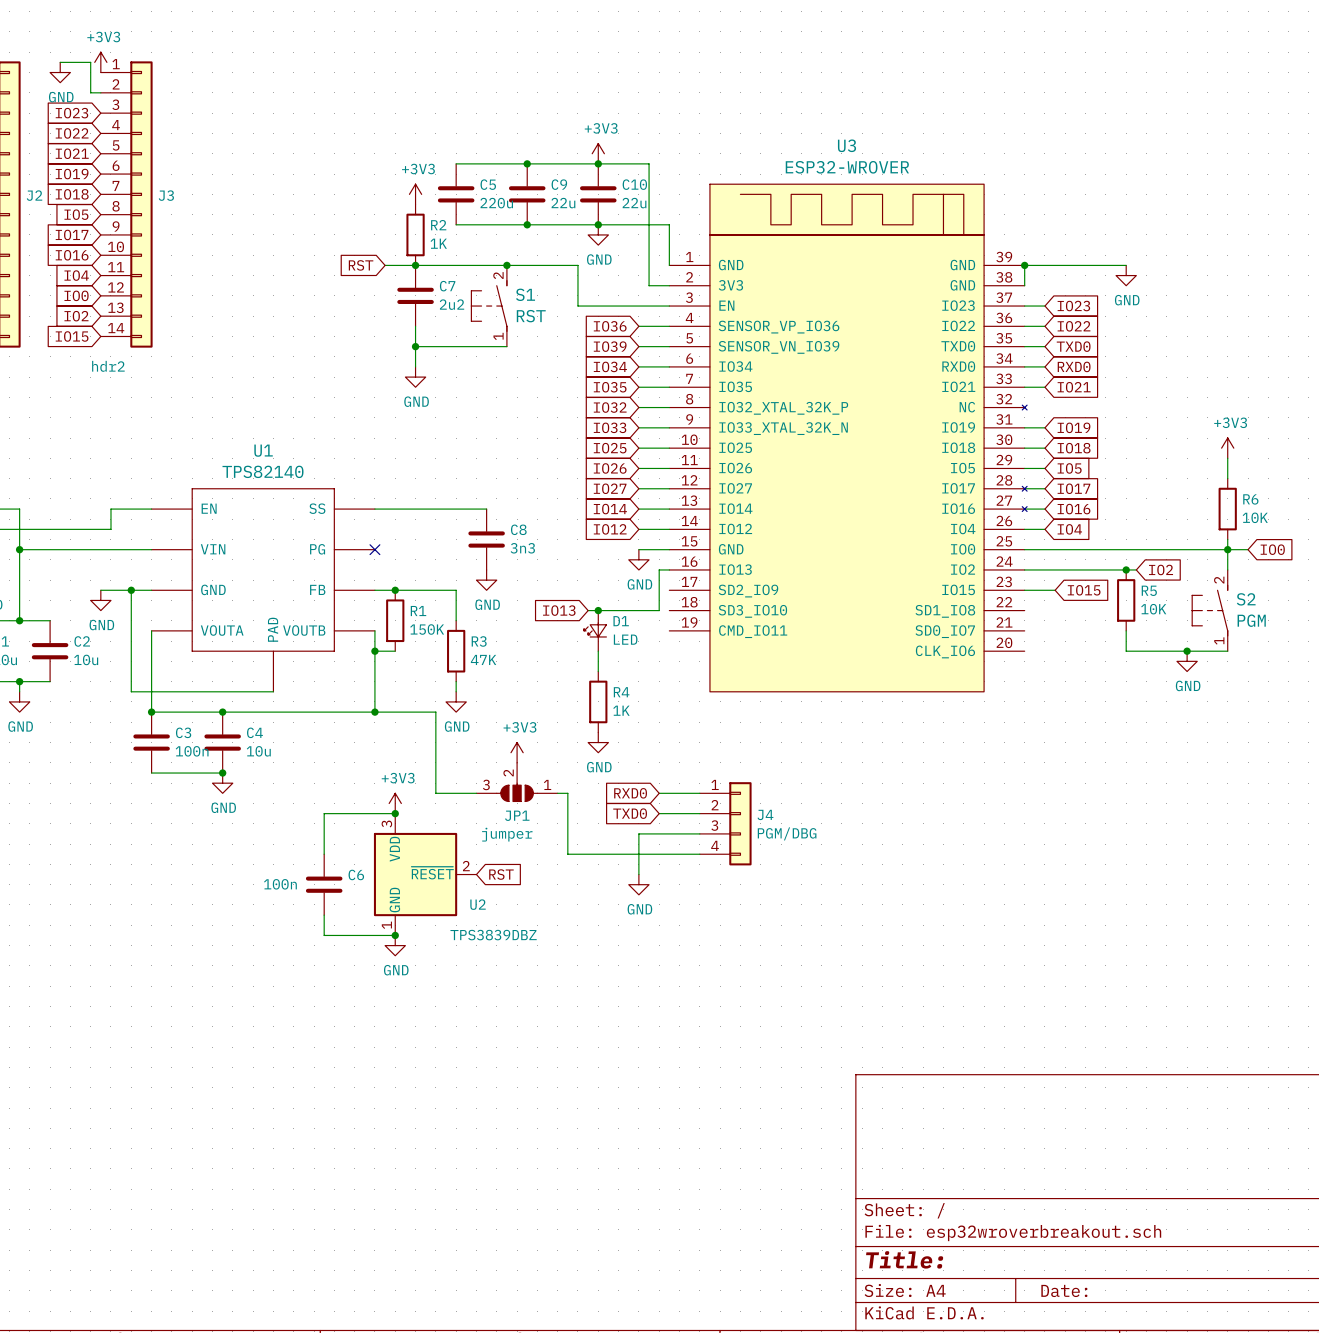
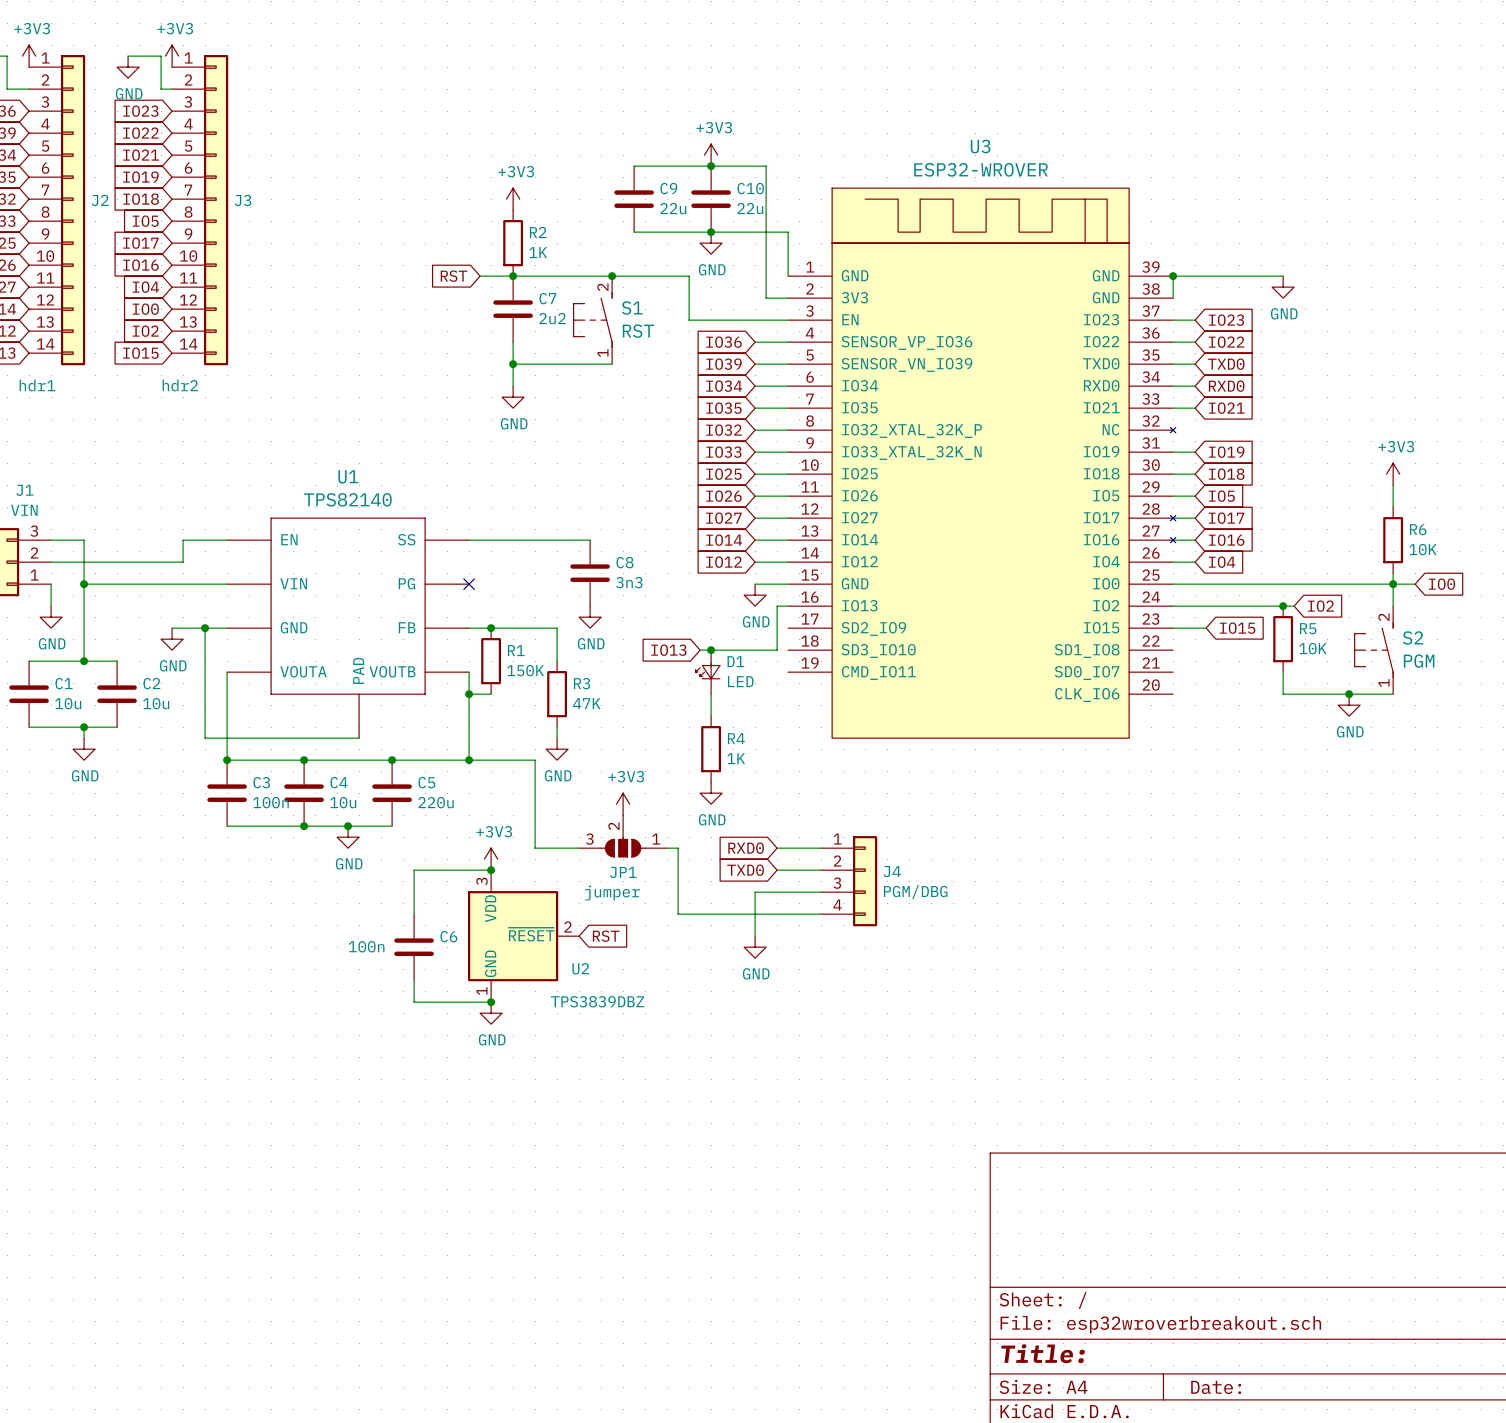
wire: (456, 163) (527, 163) -> none
junction: (527, 163) -> none
C5 position: (456, 194) -> (392, 793)
wire: (456, 224) (527, 224) -> none
junction: (527, 224) -> none
junction: none -> (392, 760)
wire: none -> (304, 826) (392, 826)
junction: none -> (348, 826)
power symbol position: GND (222, 783) -> GND (348, 837)

